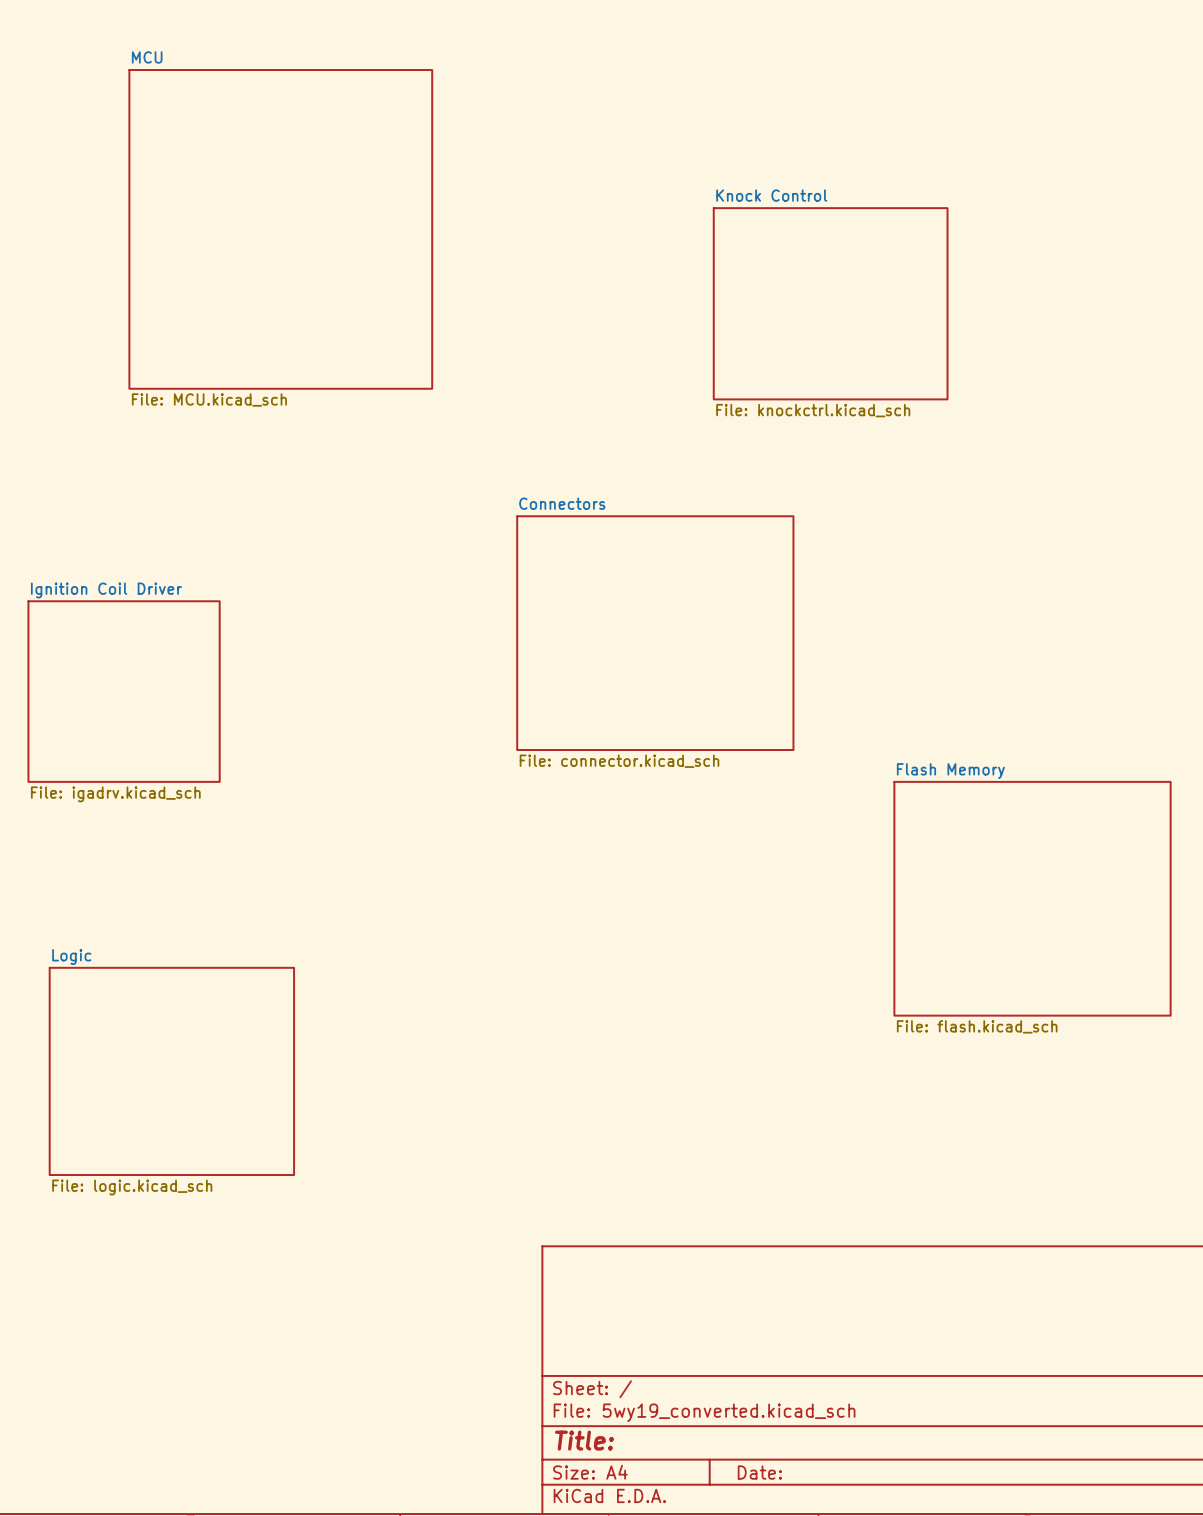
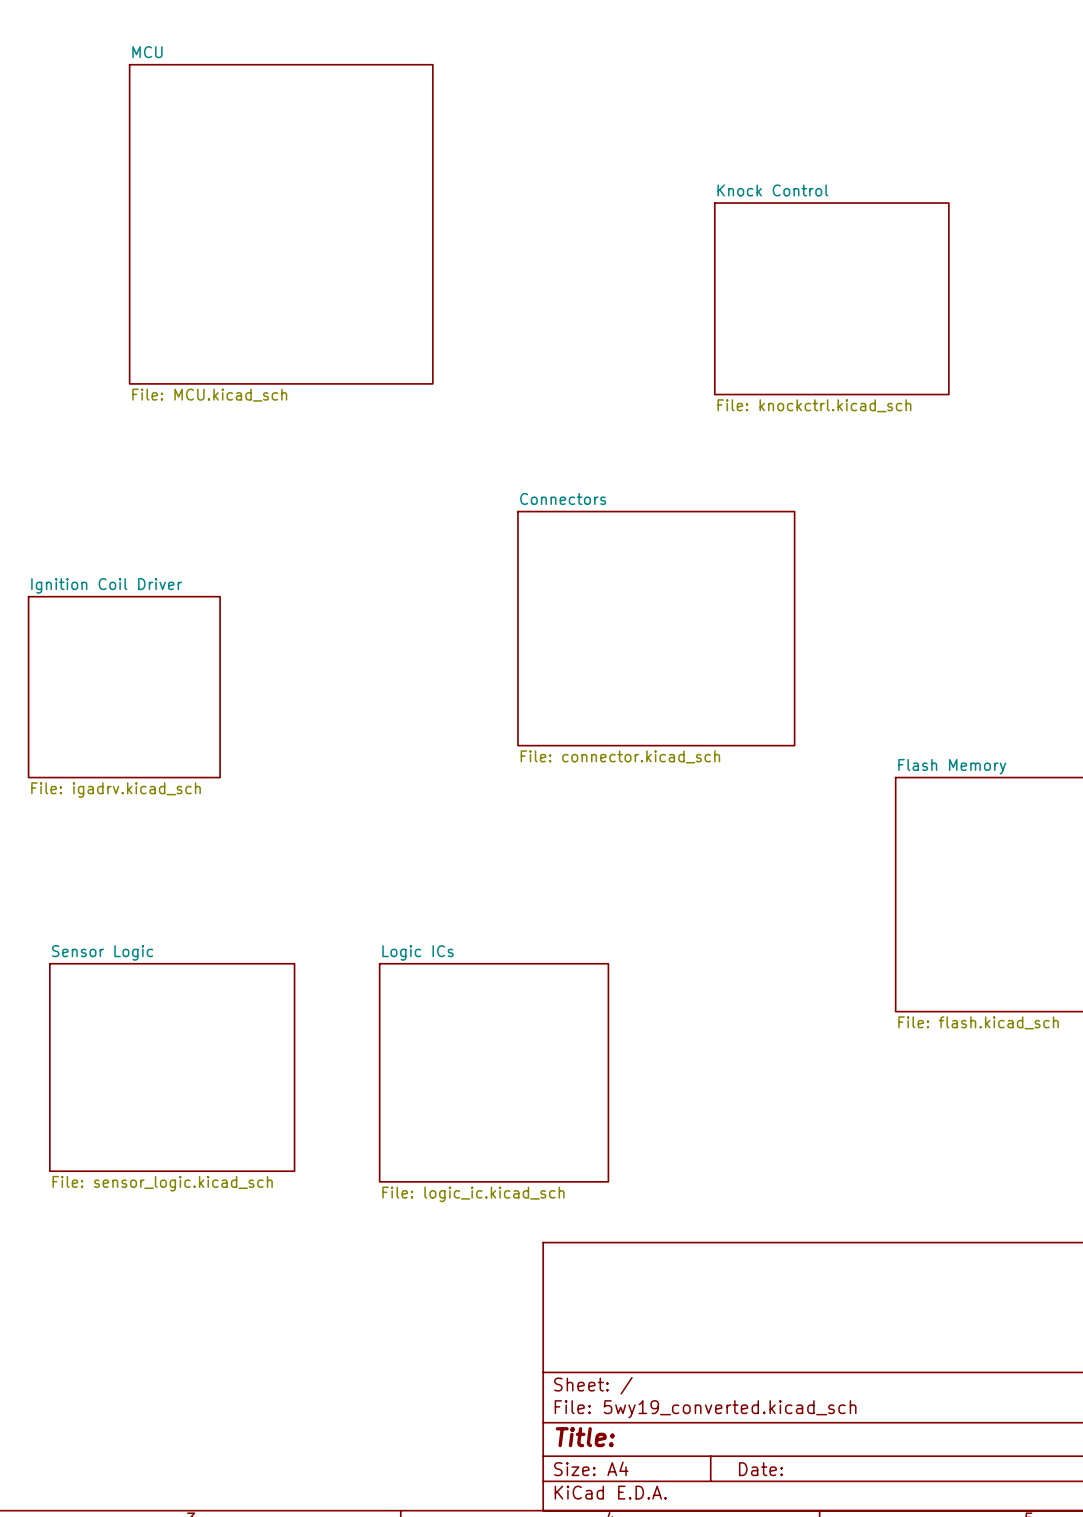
sheet Logic name: Logic (71, 957) -> Sensor Logic (102, 952)
sheet Logic ICs: none -> File: logic_ic.kicad_sch (494, 1072)
sheet Logic value: File: logic.kicad_sch (132, 1187) -> File: sensor_logic.kicad_sch (162, 1183)

